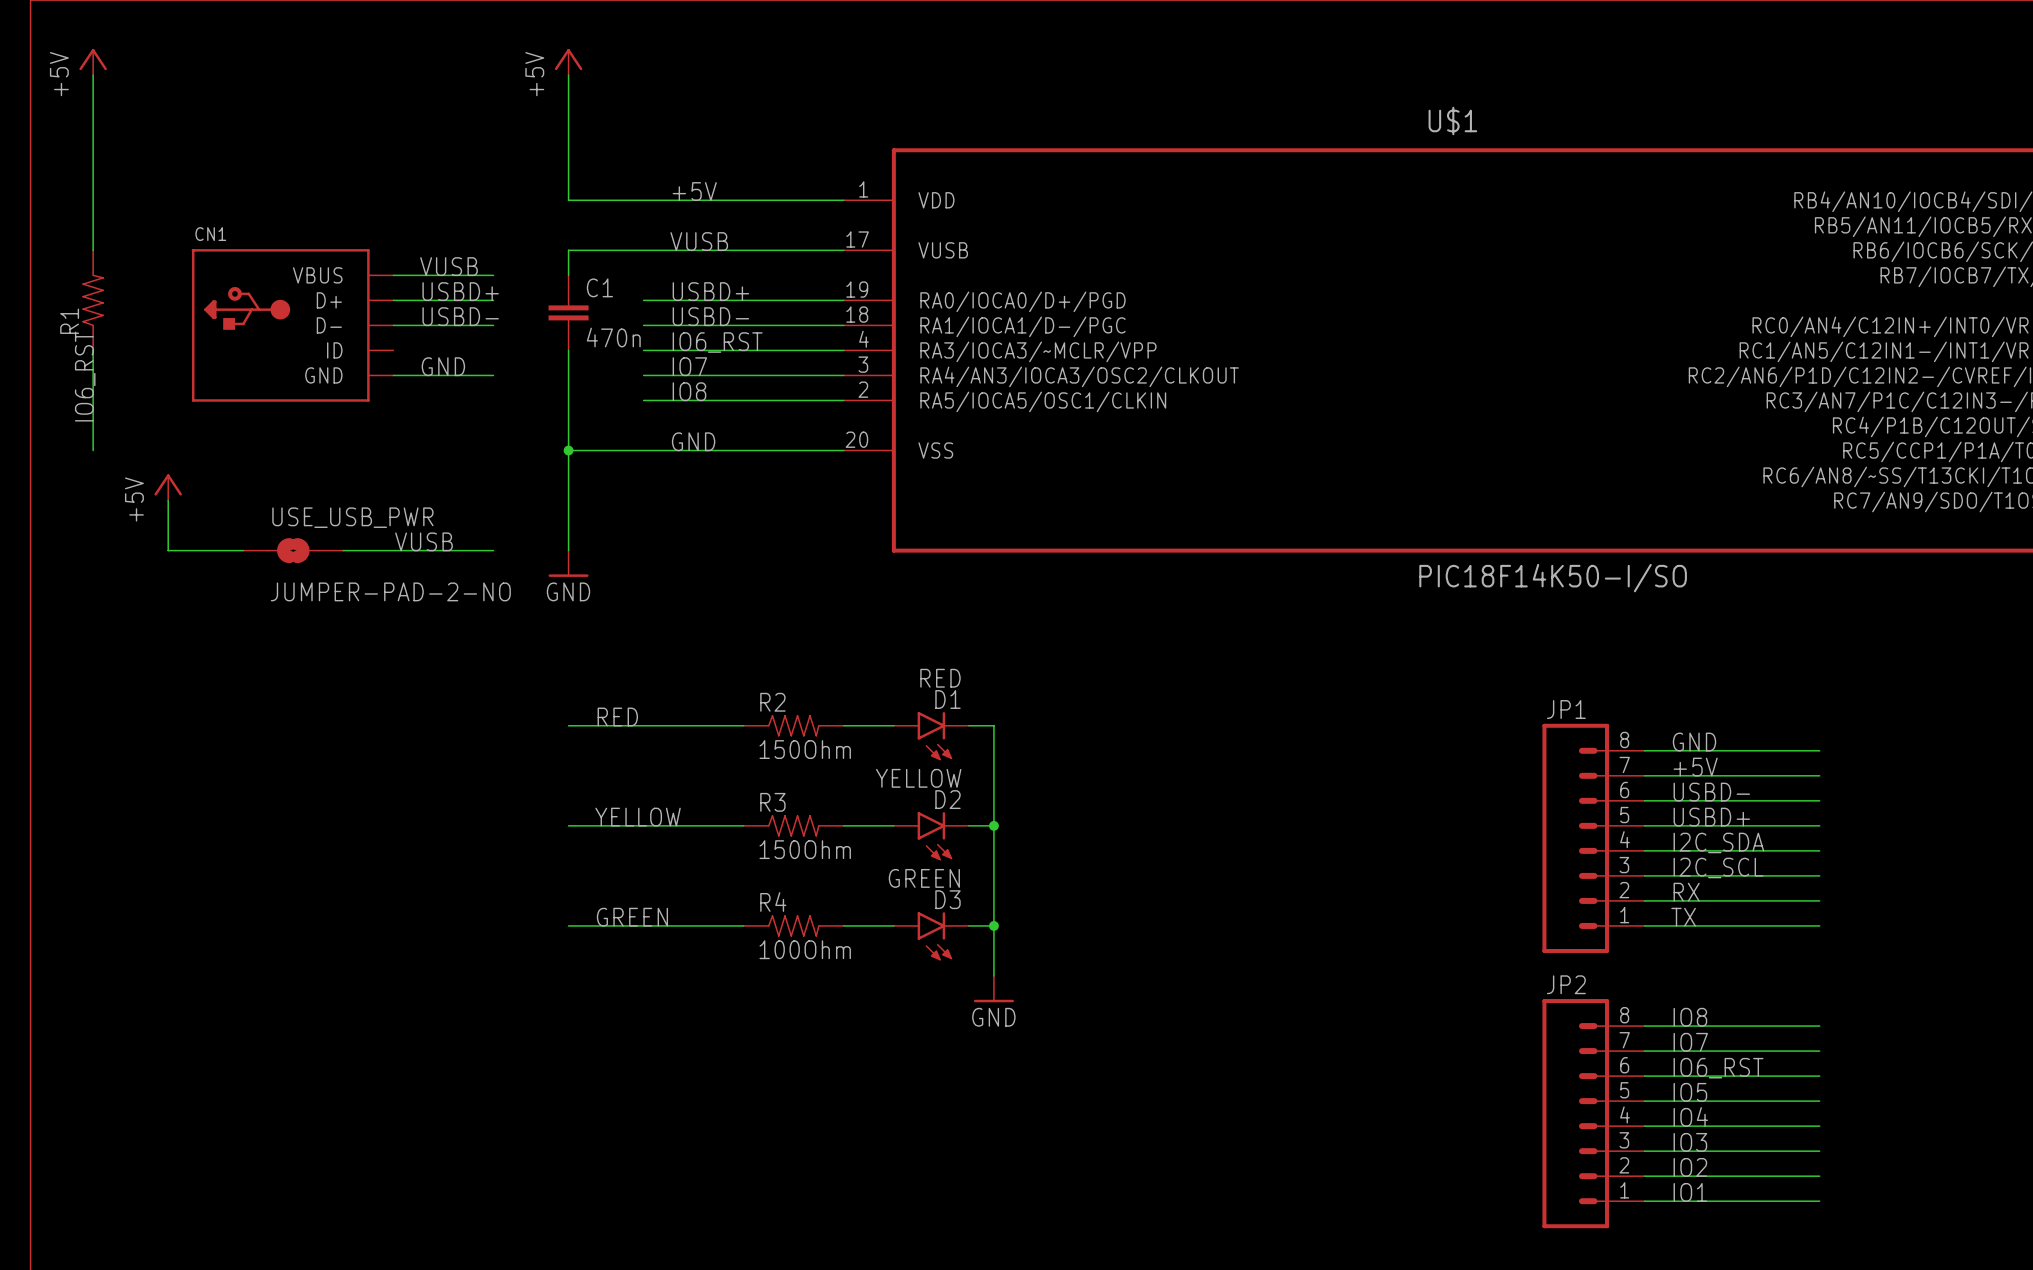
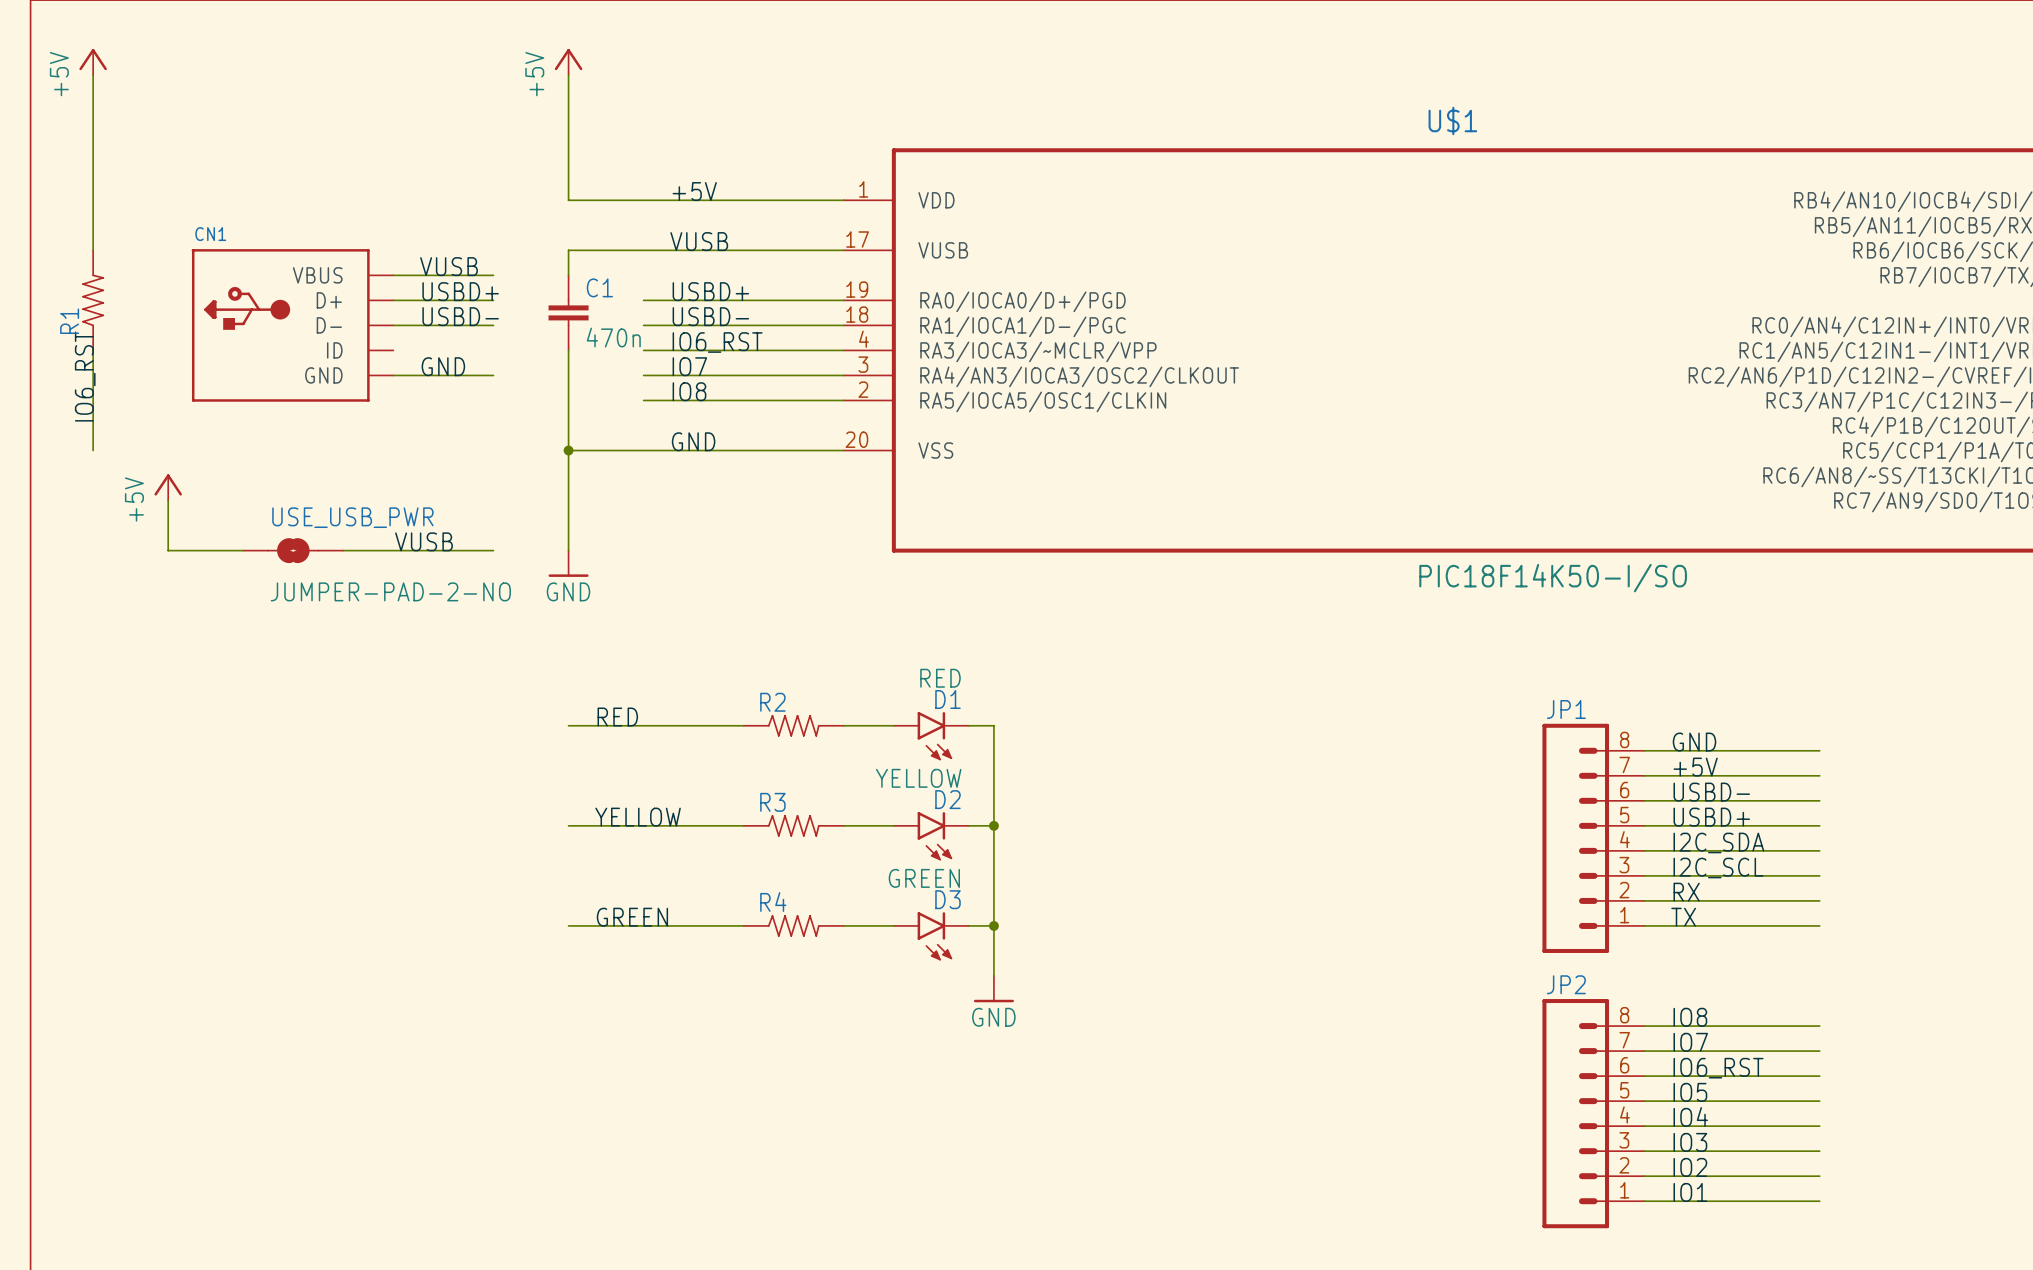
R2 value: 150Ohm (805, 749) -> none
R3 value: 150Ohm (805, 849) -> none
R4 value: 100Ohm (805, 949) -> none

